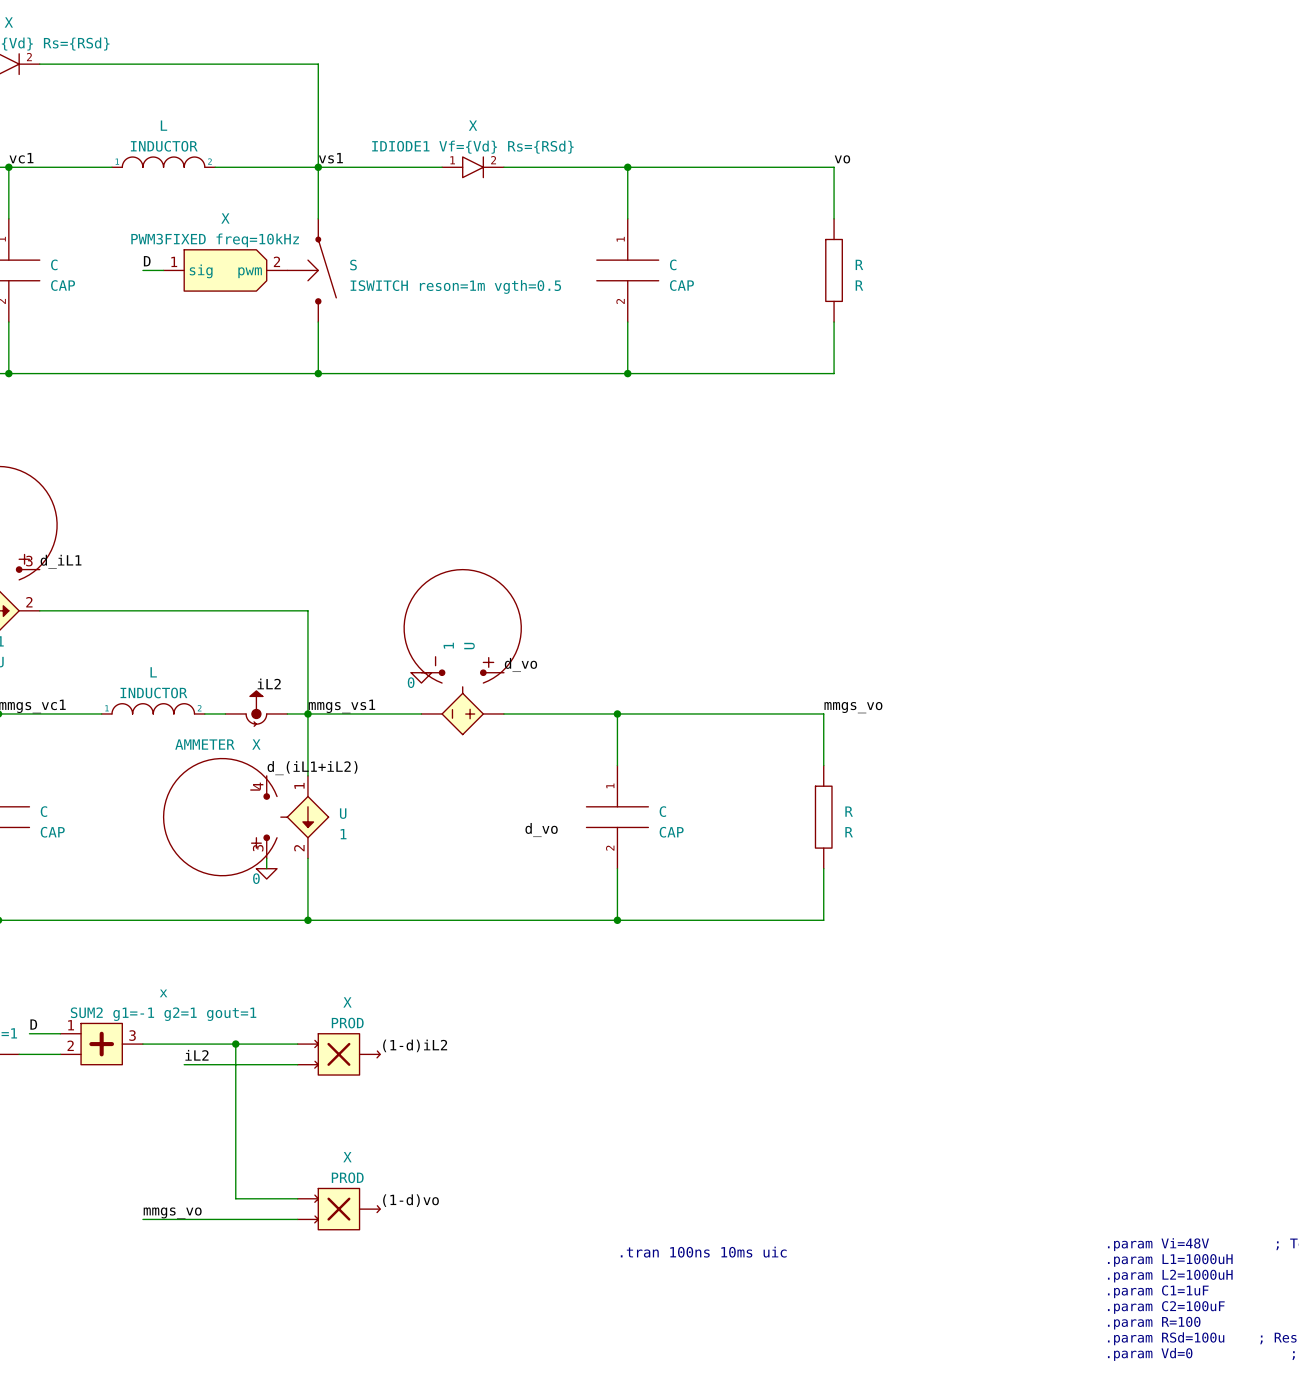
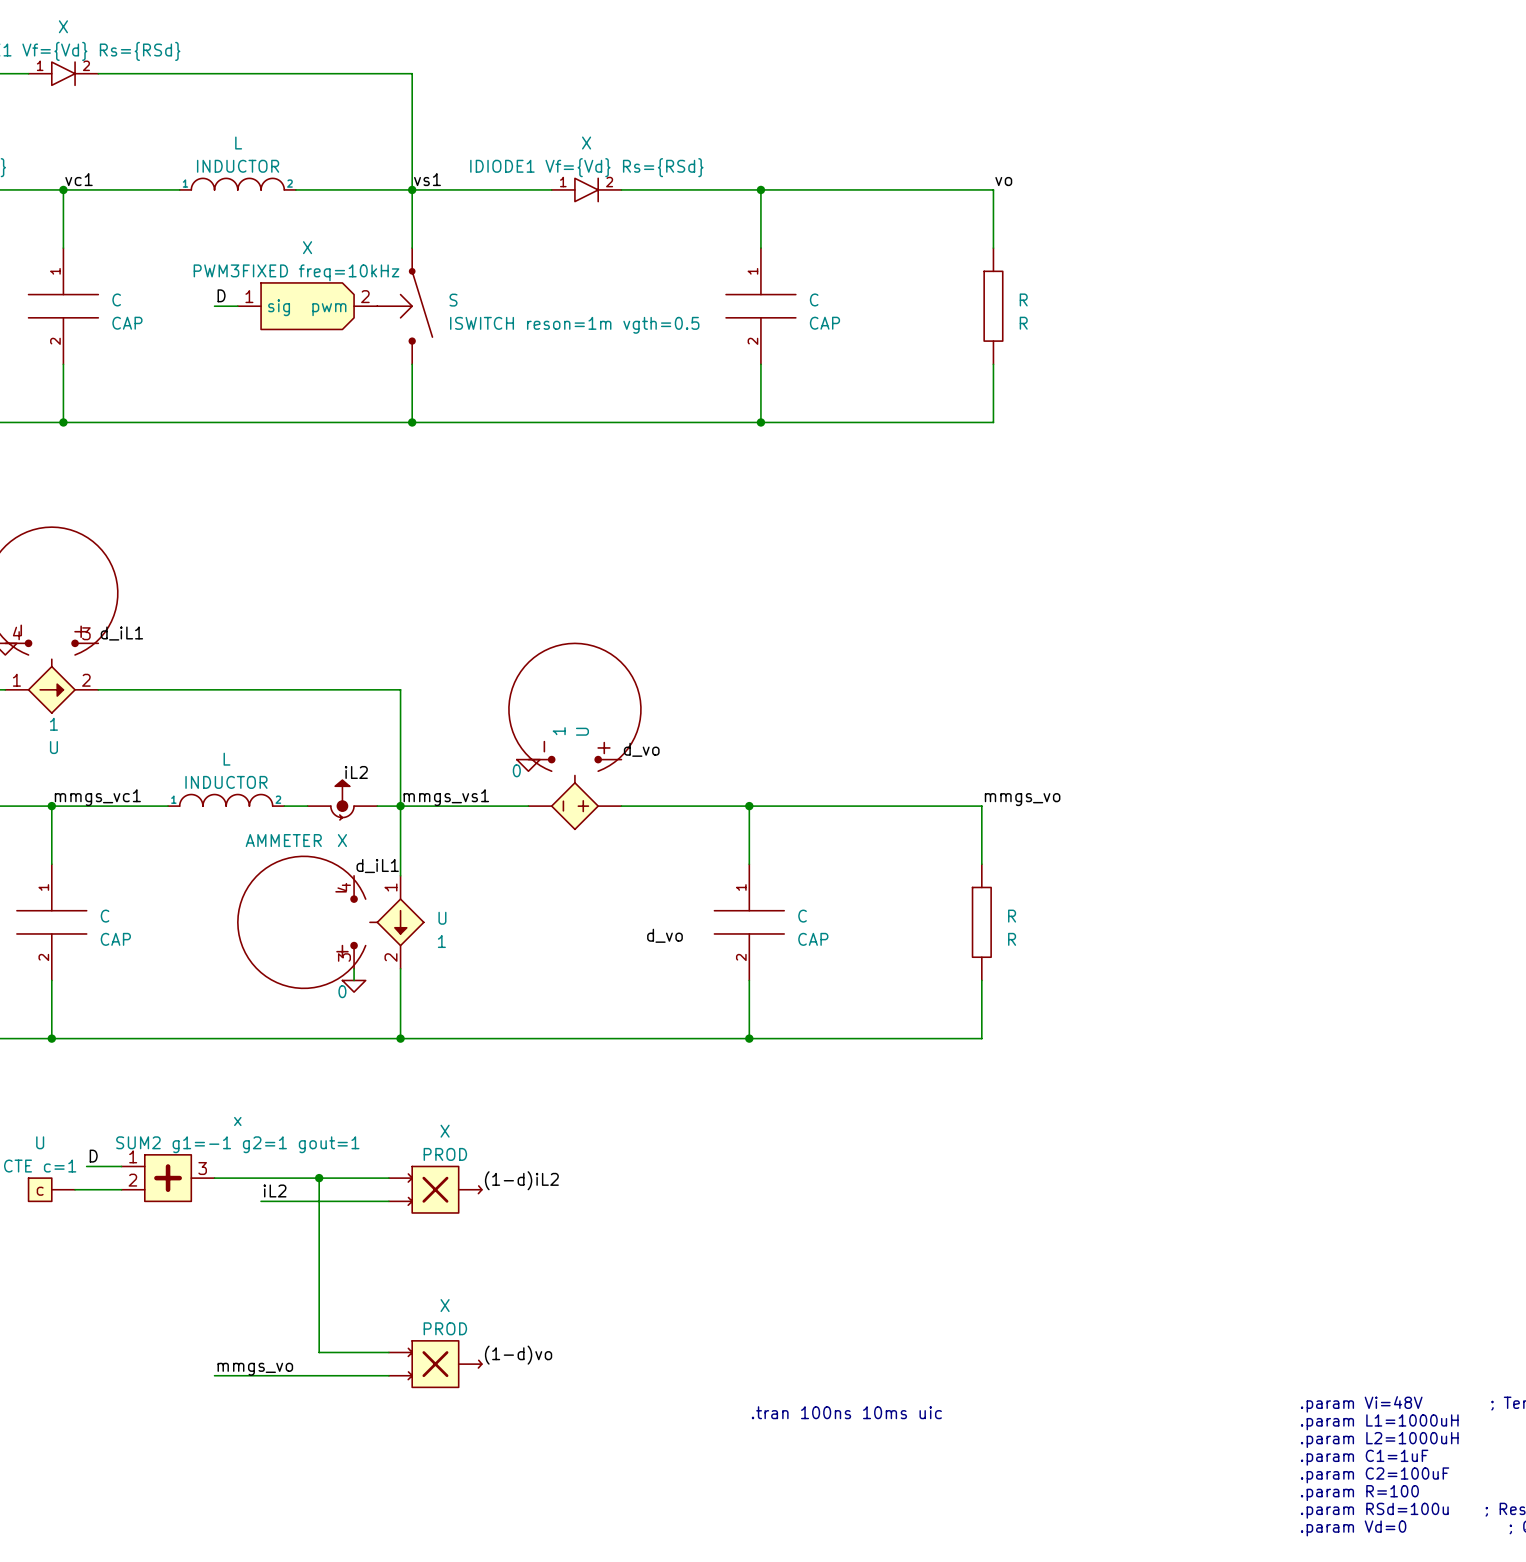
label: d_(iL1+iL2) (312, 768) -> d_iL1 (377, 866)

